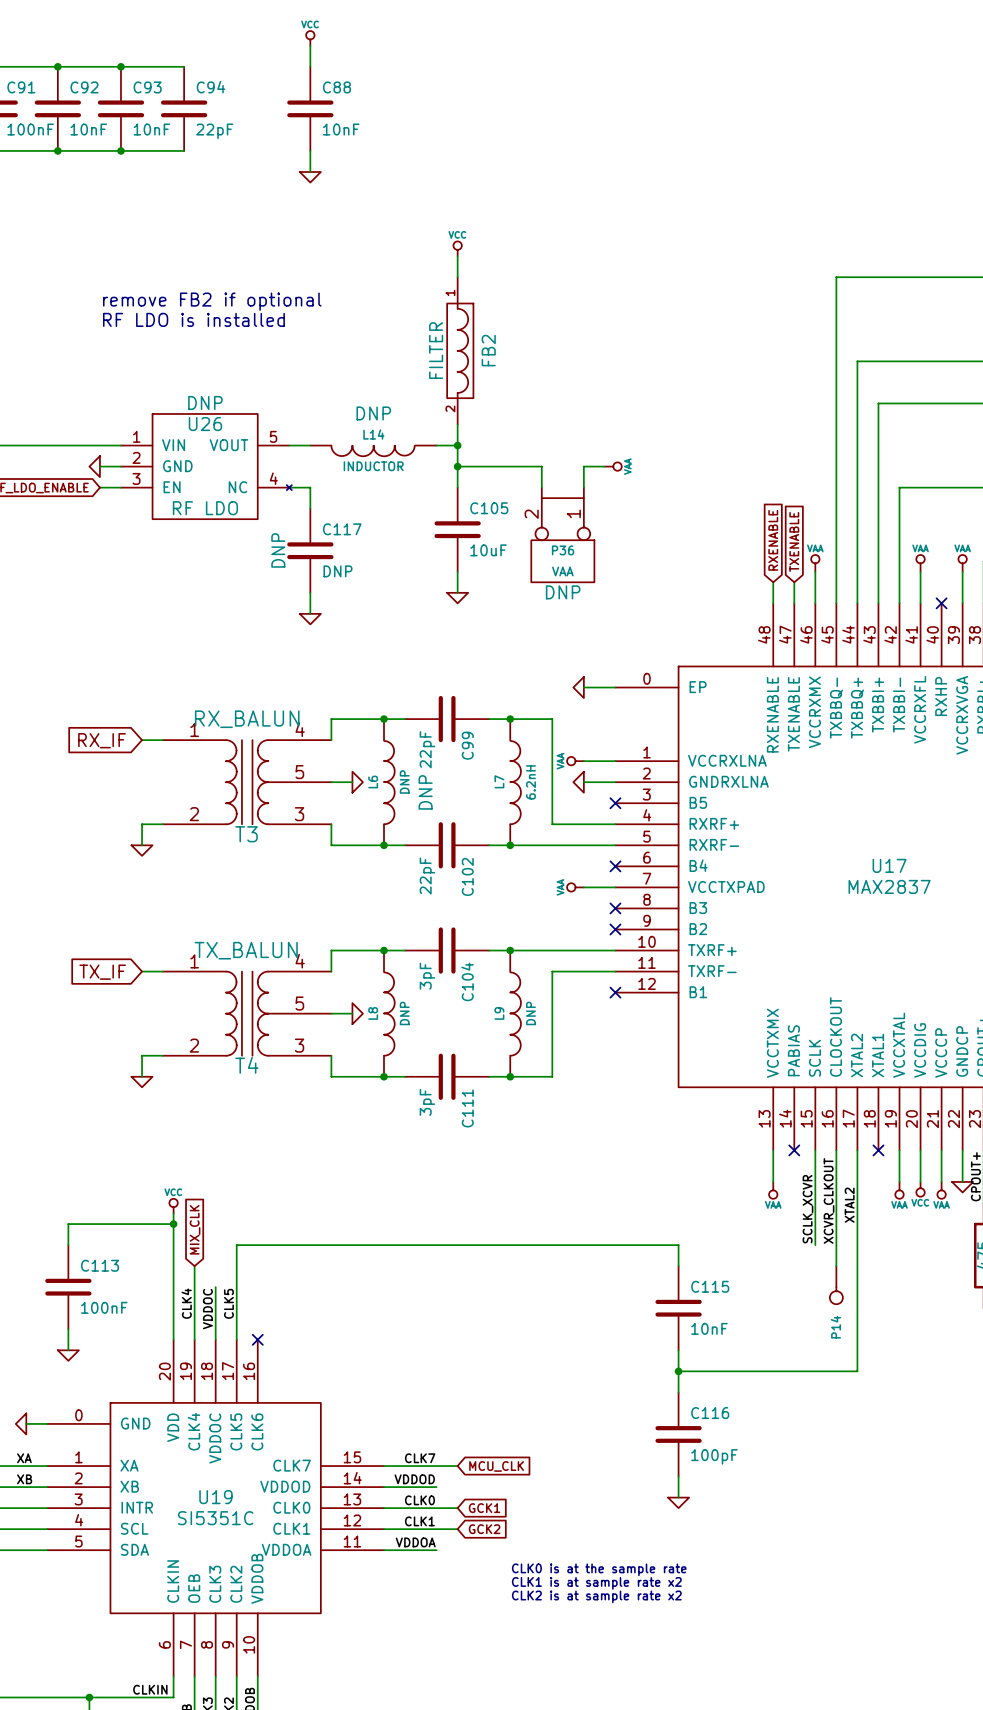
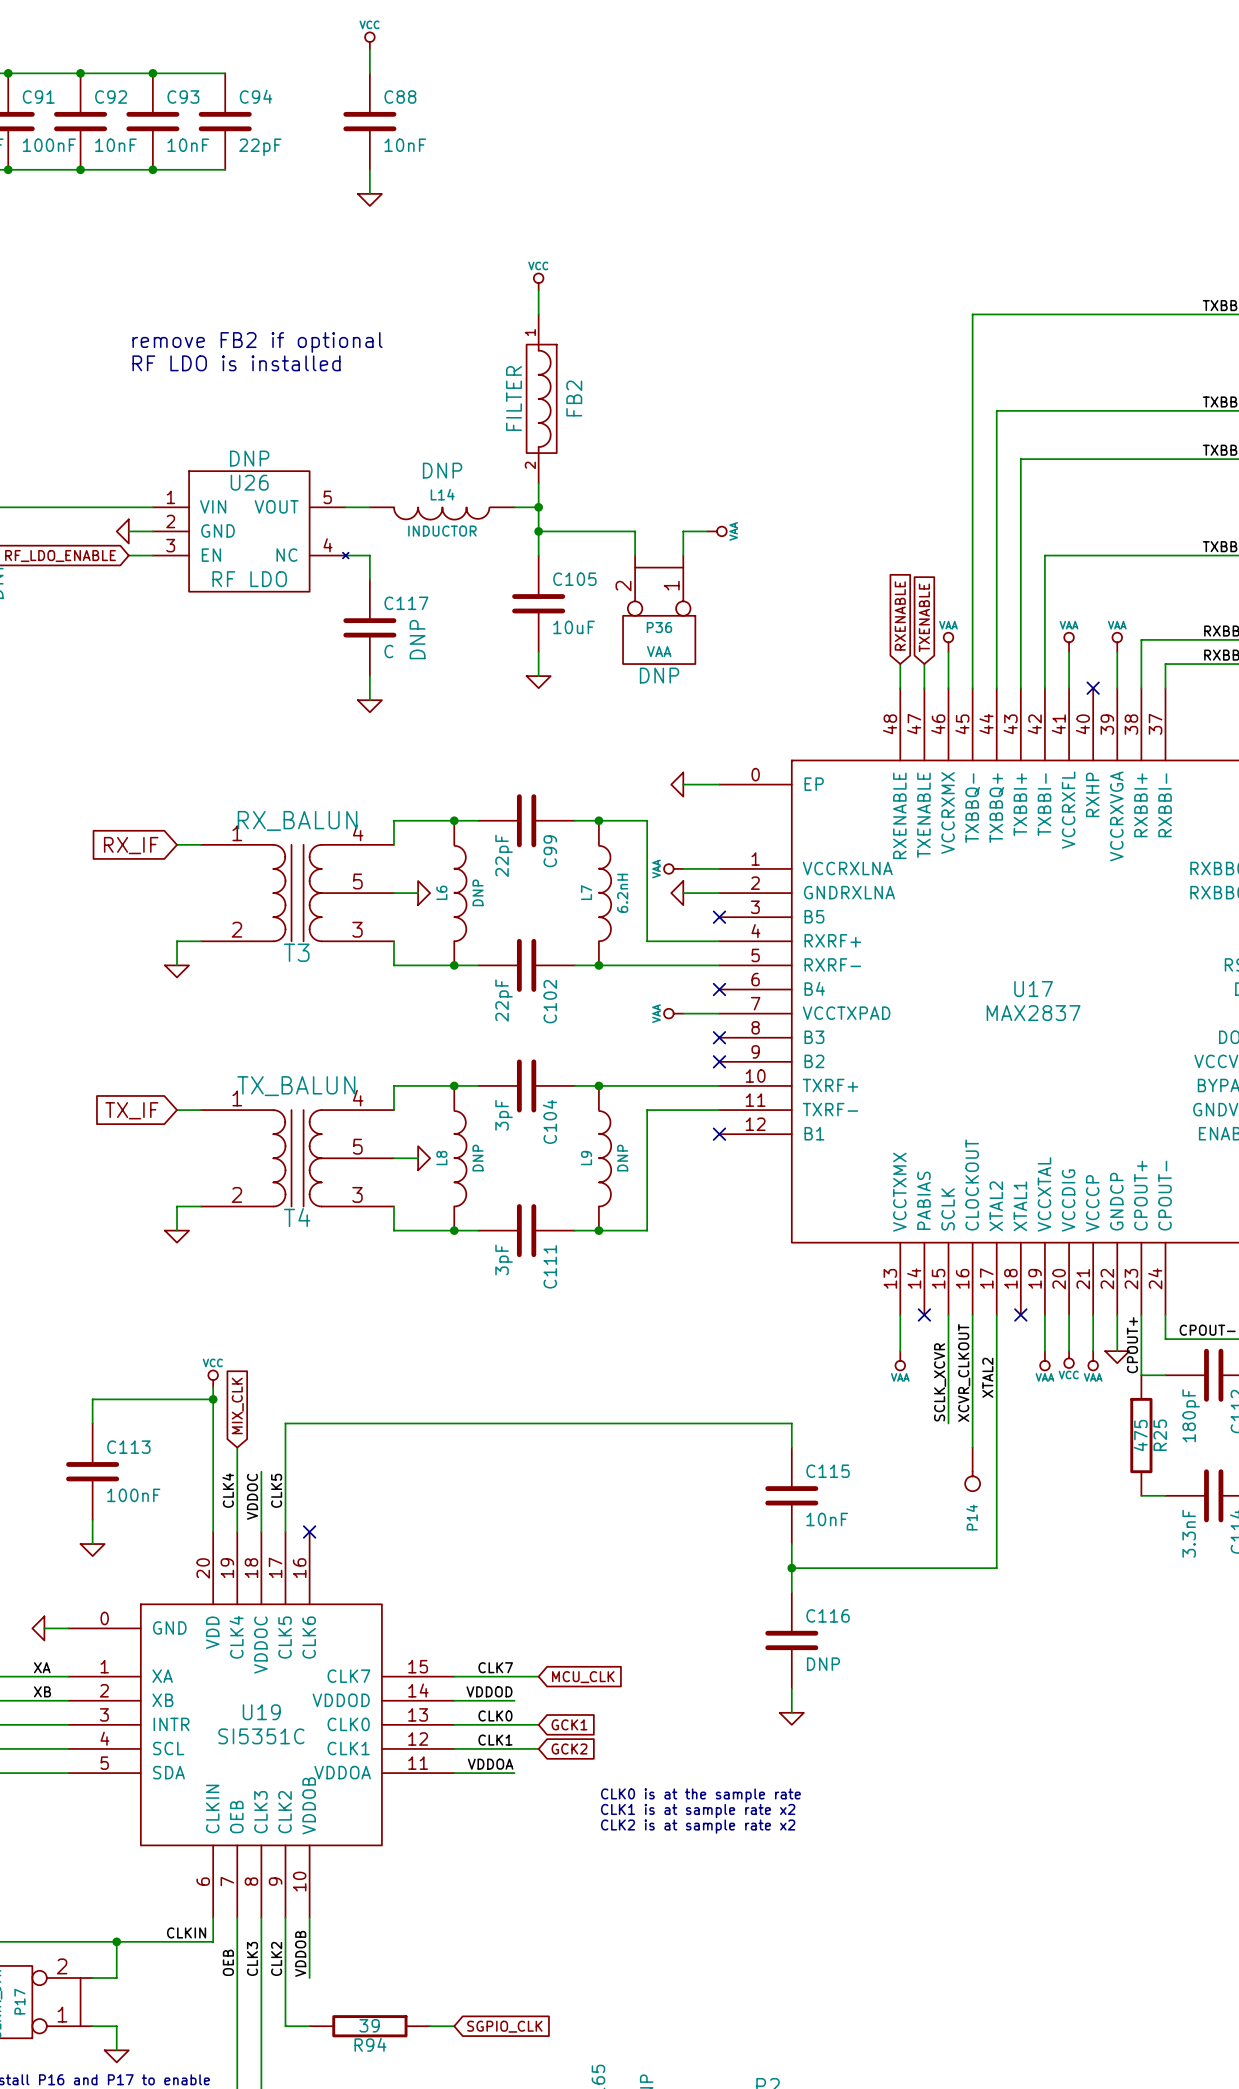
C117 text position: DNP (278, 550) -> DNP (417, 639)
C117 value: DNP (337, 571) -> C (388, 651)
L6 text: DNP (425, 792) -> none
C116 value: 100pF (714, 1456) -> DNP (823, 1664)

